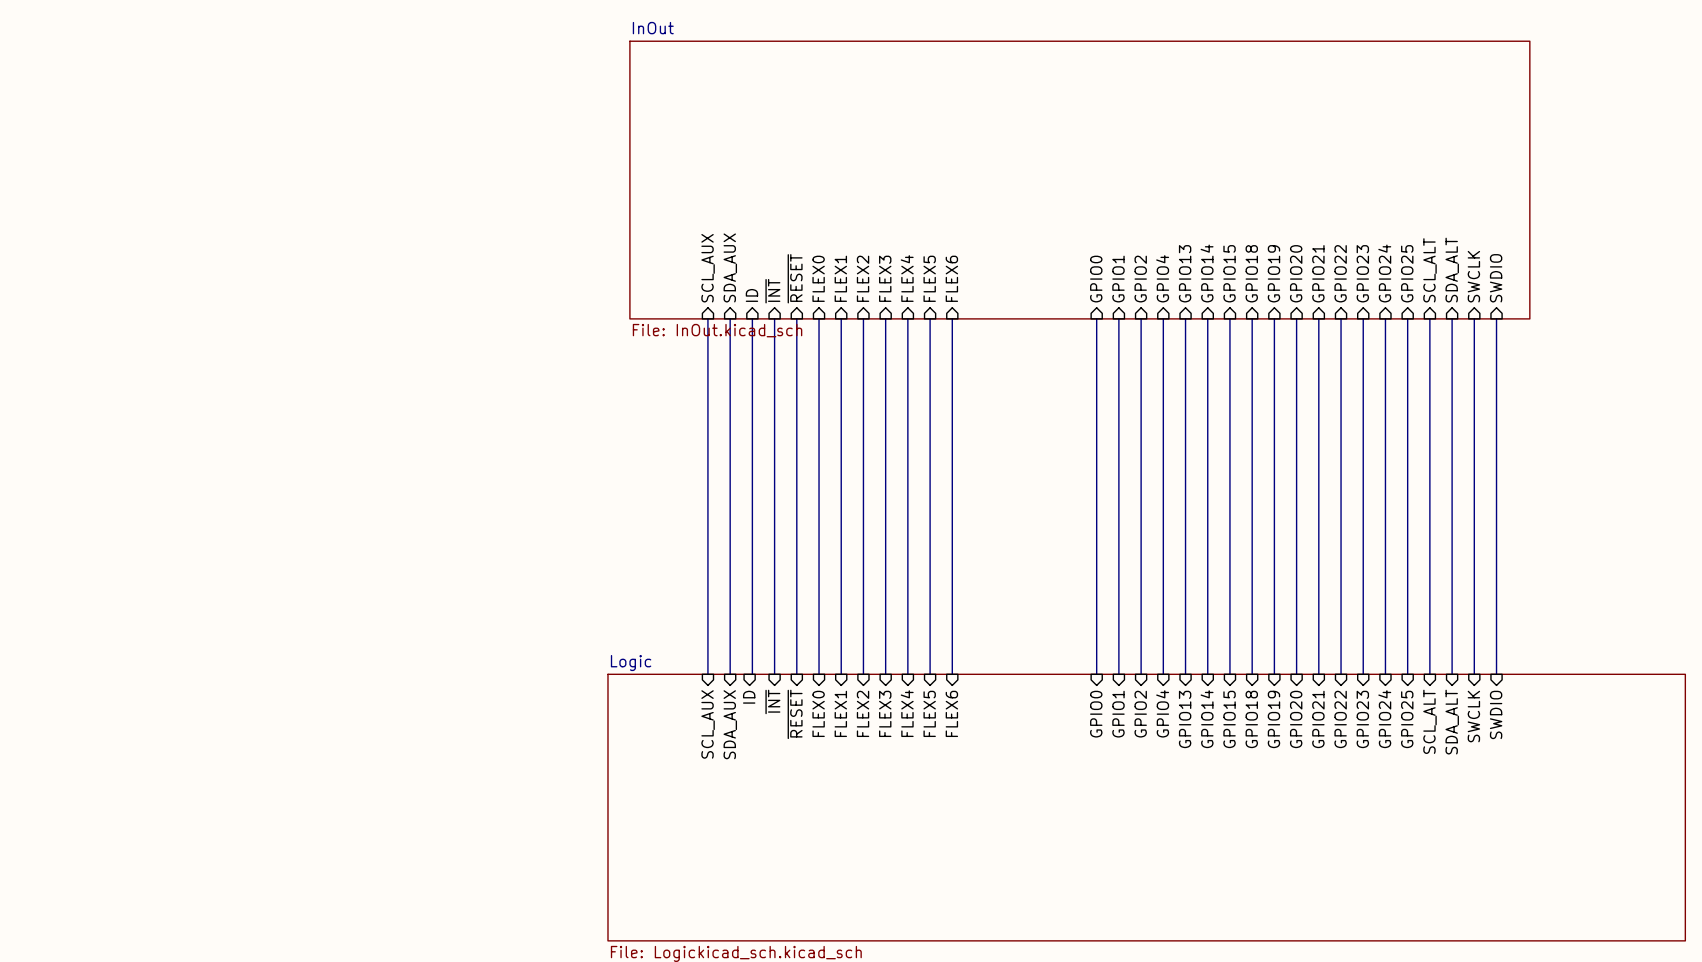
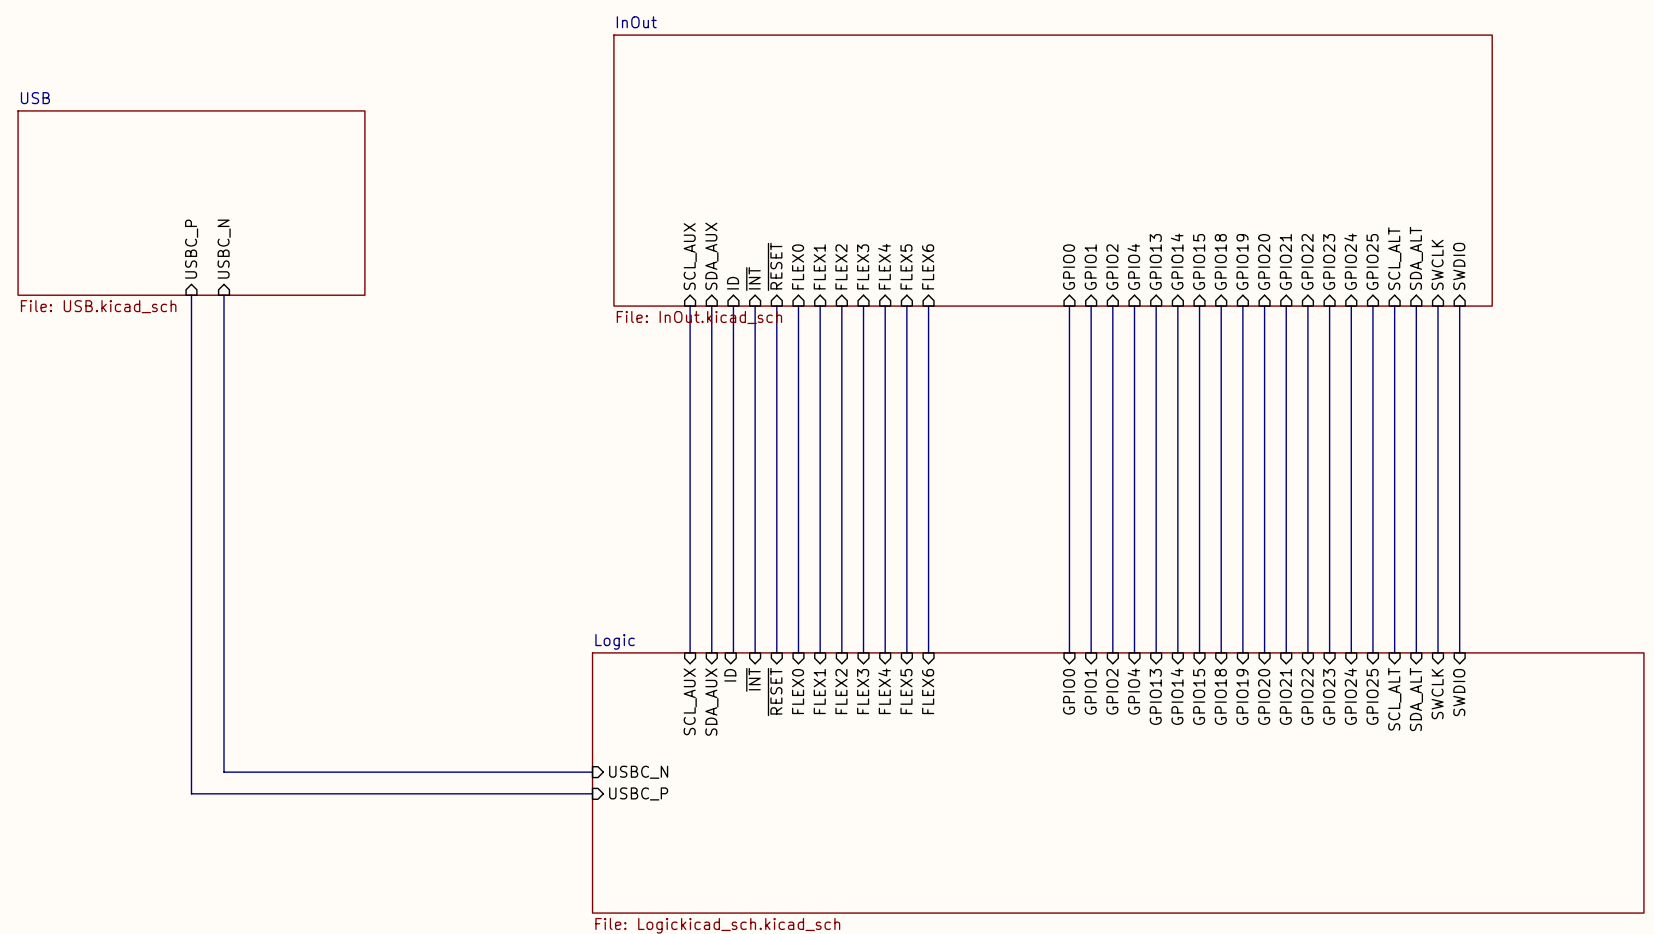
sheet USB: none -> File: USB.kicad_sch (191, 203)
sheet pin: none -> USBC_P (191, 249)
sheet pin: none -> USBC_N (224, 249)
wire: none -> (191, 295) (191, 793) (592, 793)
wire: none -> (223, 295) (223, 772) (592, 772)
sheet pin: none -> USBC_N (638, 772)
sheet pin: none -> USBC_P (638, 793)

